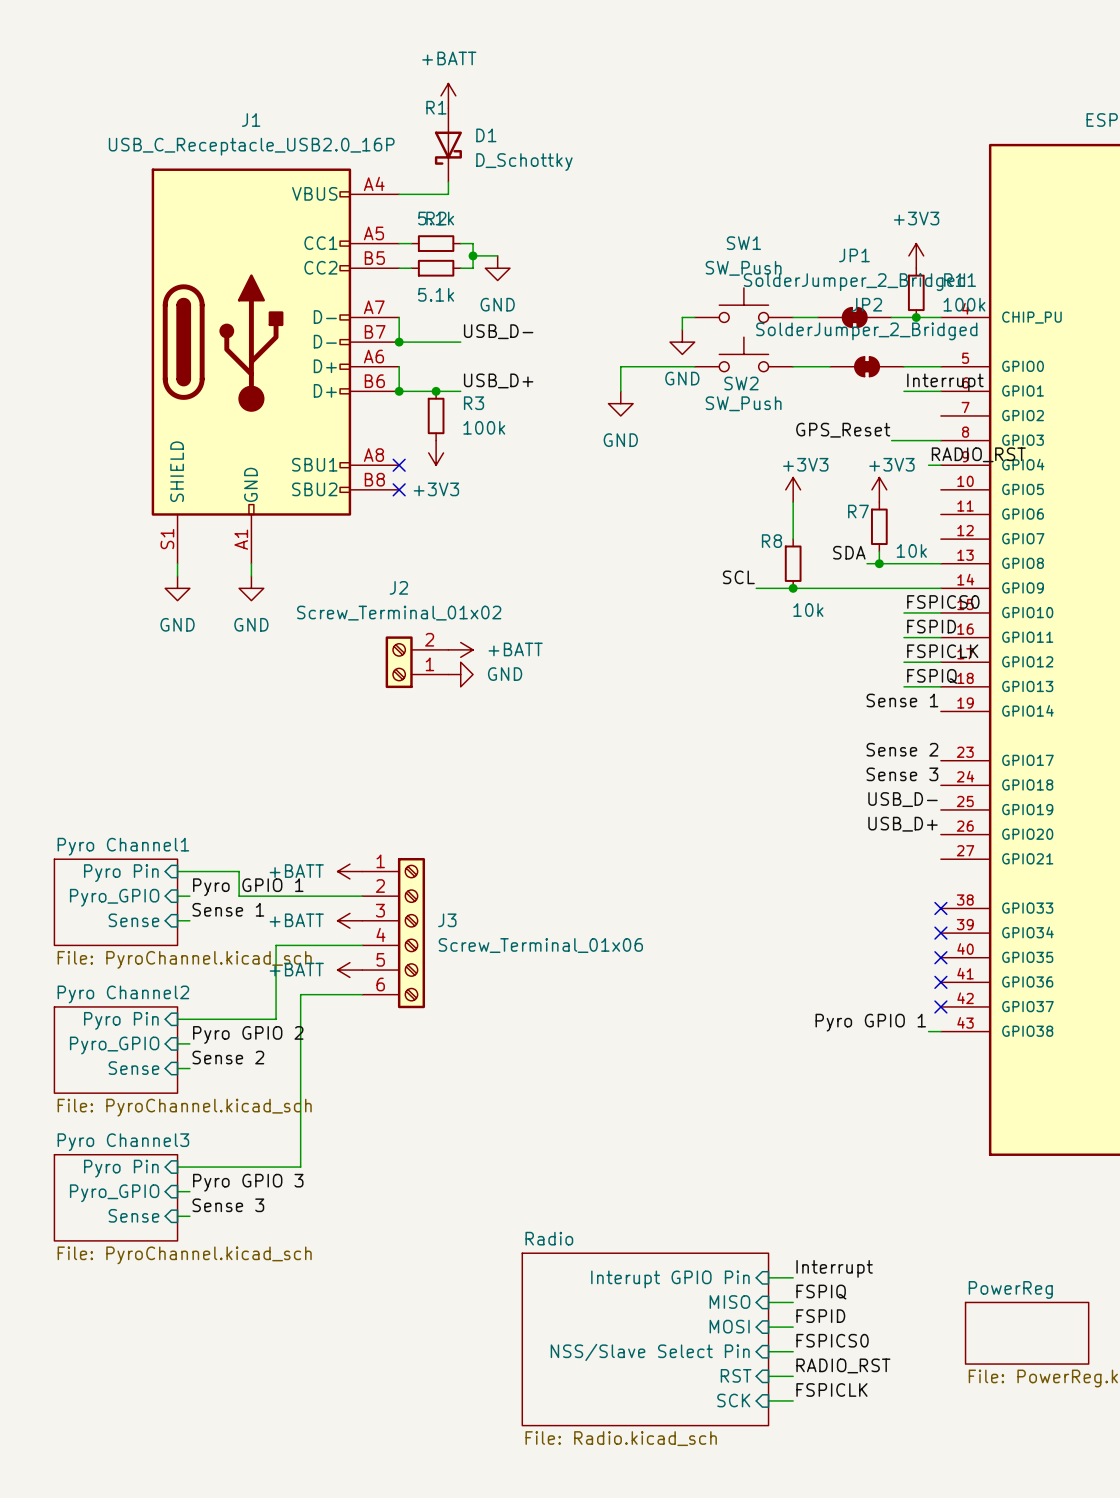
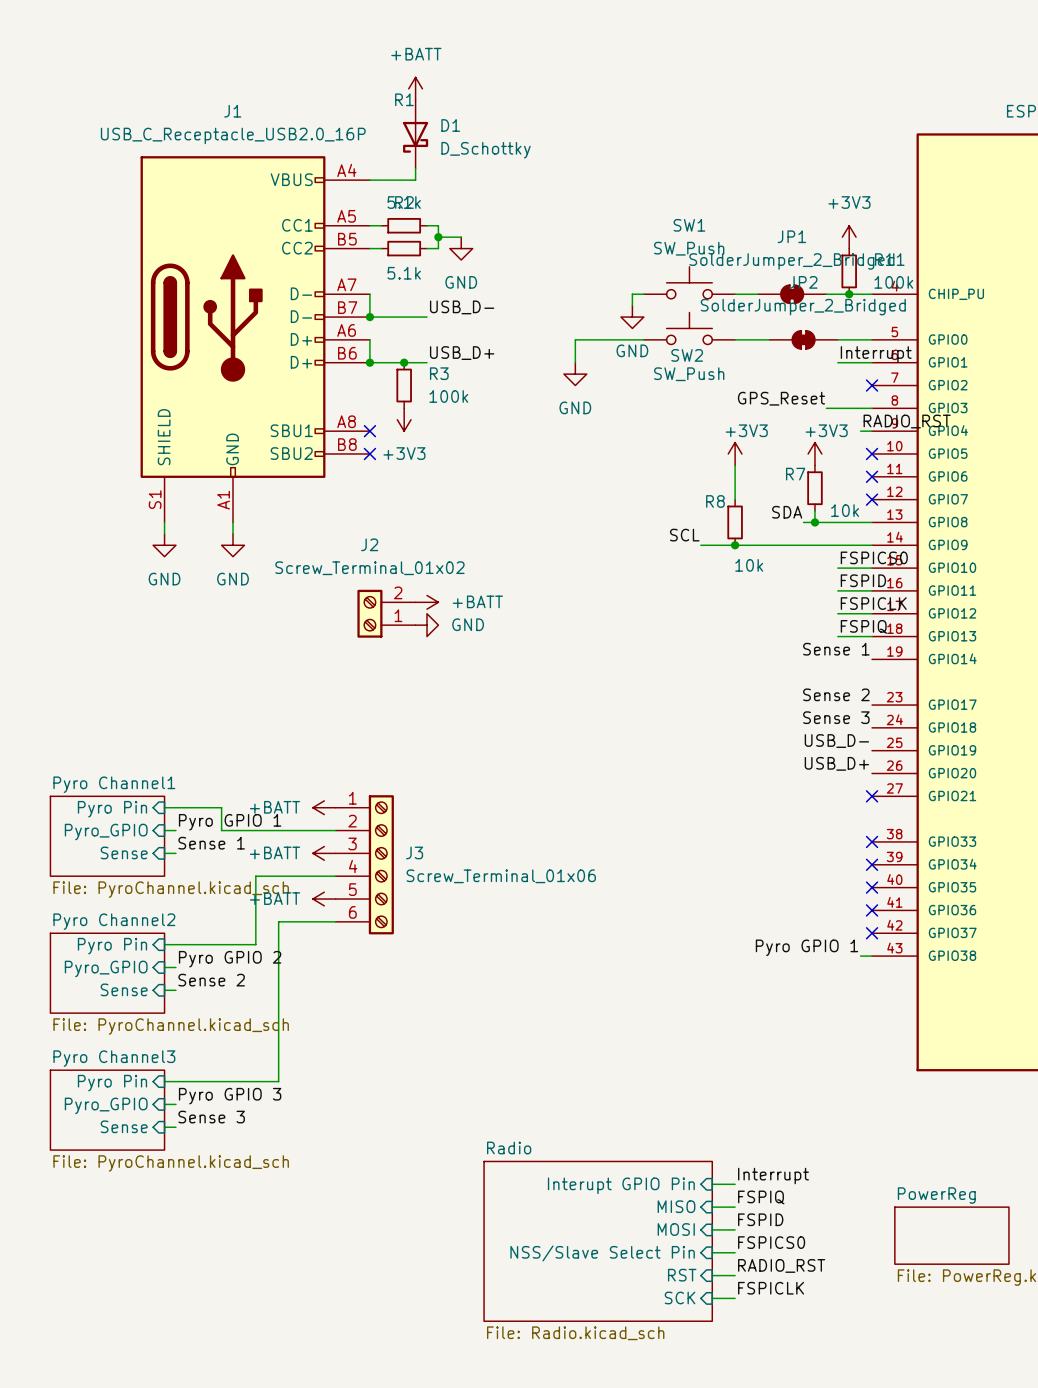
no-connect mark: none -> (872, 385)
no-connect mark: none -> (872, 453)
no-connect mark: none -> (872, 476)
no-connect mark: none -> (872, 499)
no-connect mark: none -> (872, 796)

